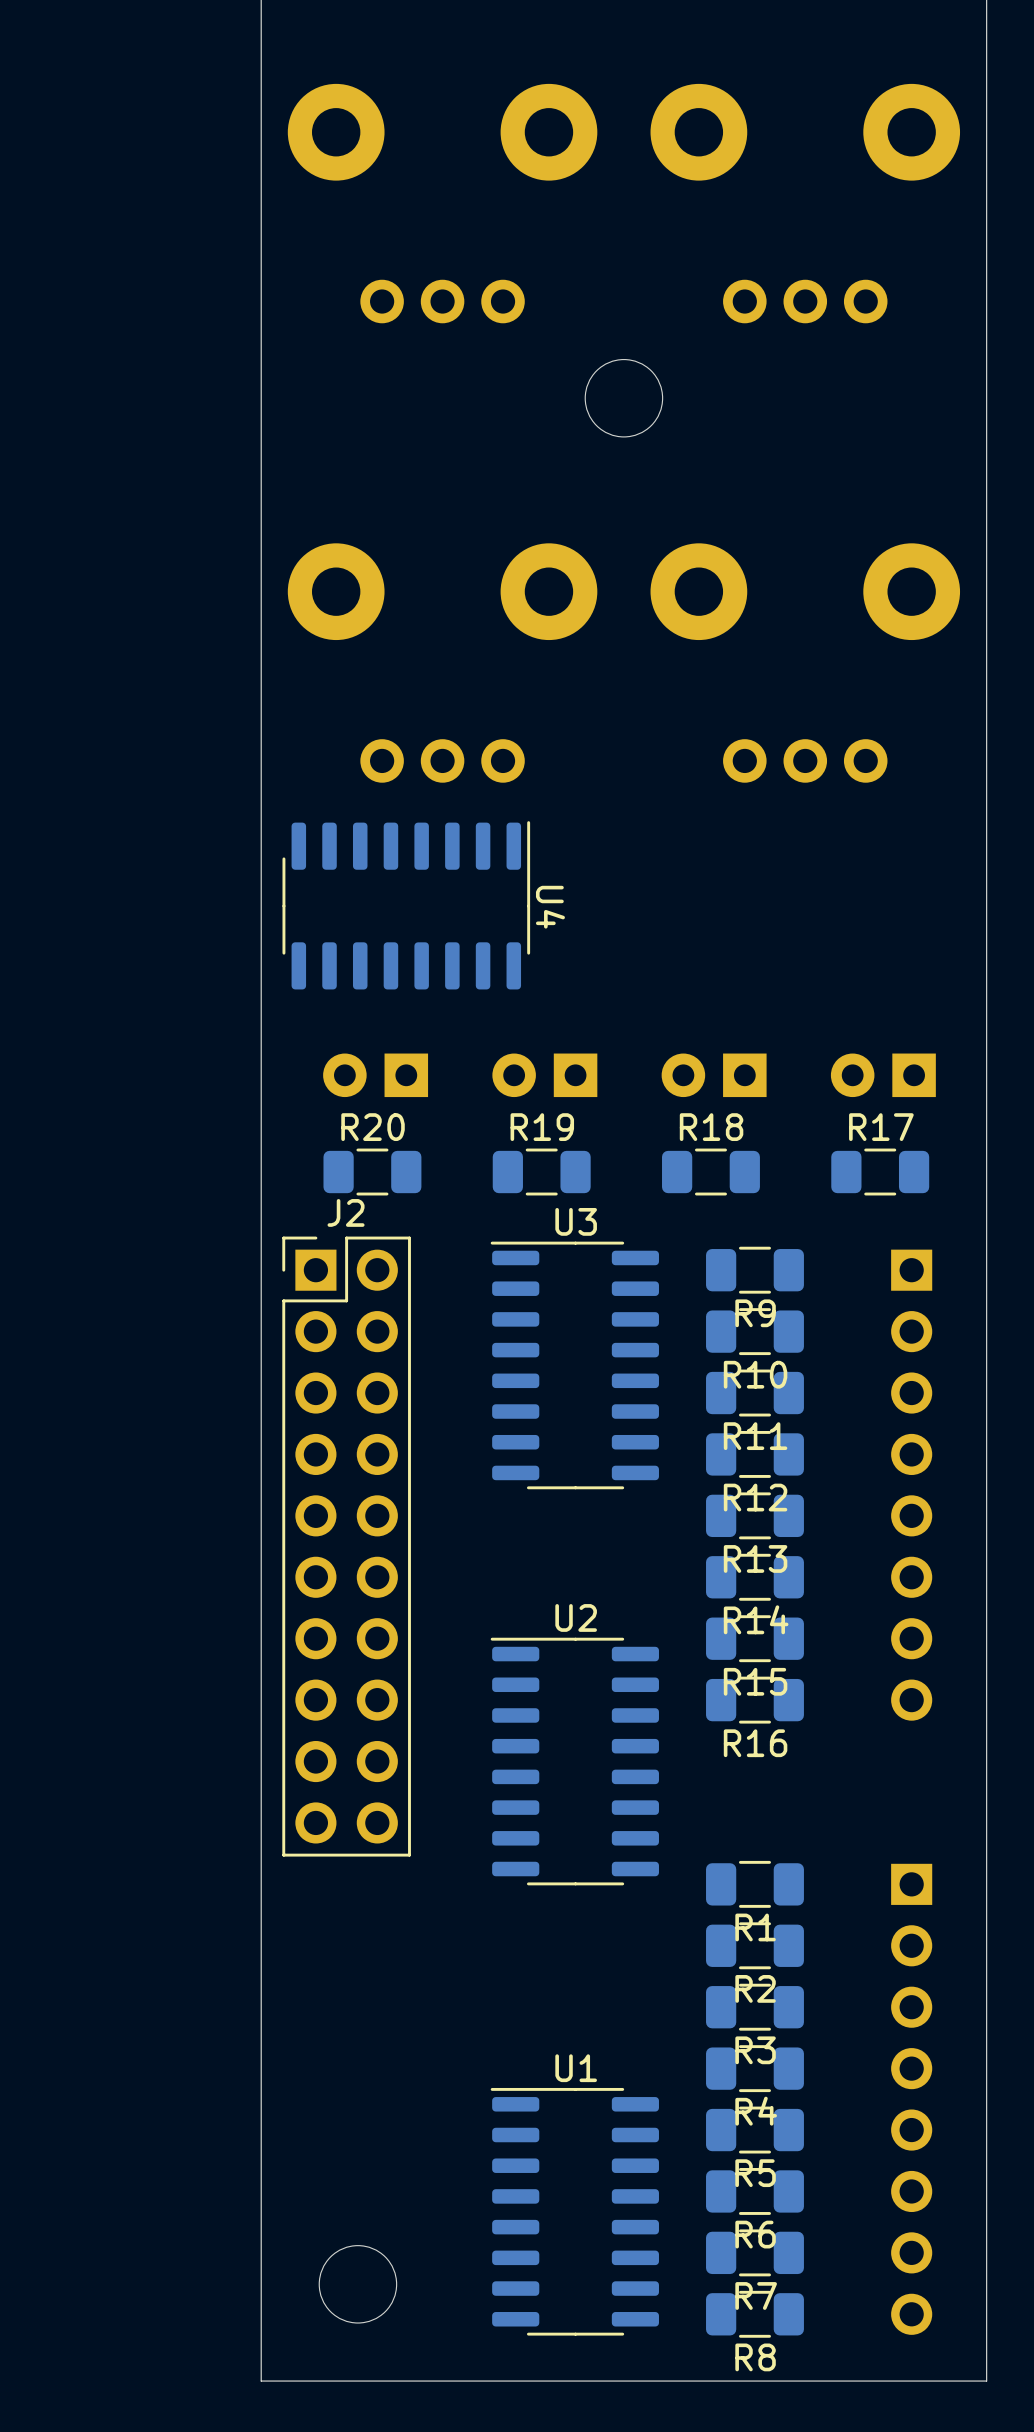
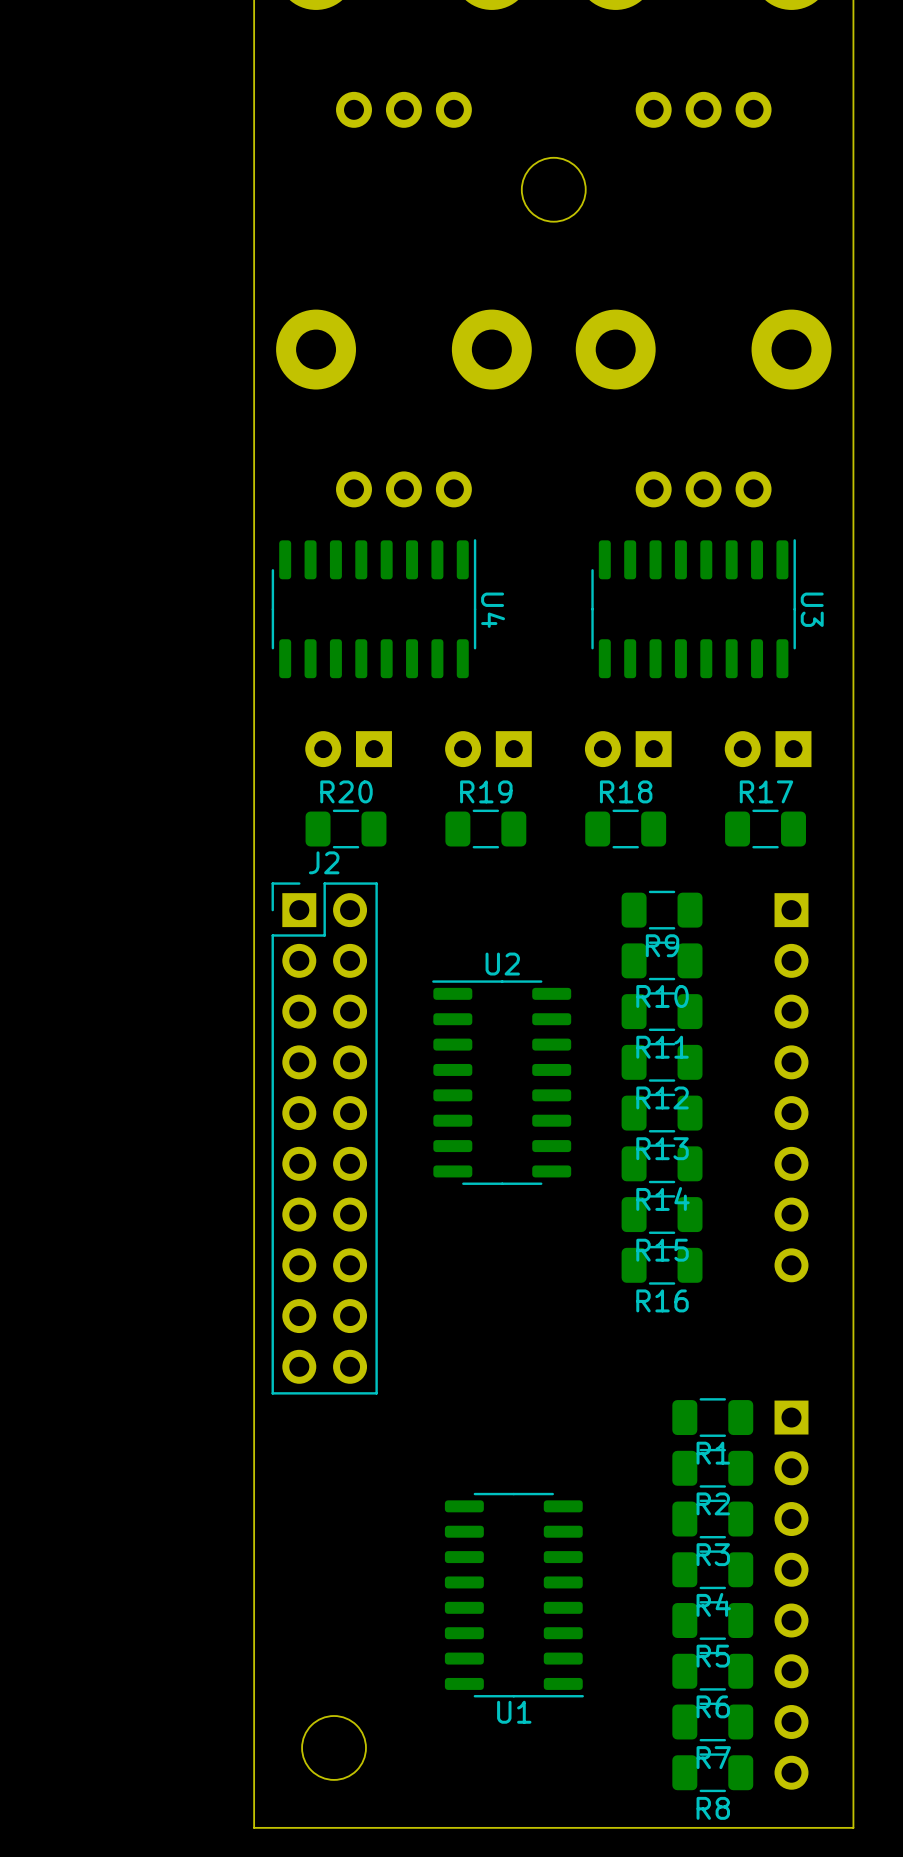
U3 rotation: 0° (574, 1365) -> 90° clockwise (693, 608)
U3 position: (574, 1365) -> (693, 608)
U2 position: (574, 1761) -> (501, 1082)
R1 position: (754, 1884) -> (712, 1417)
R2 position: (754, 1945) -> (712, 1468)
R3 position: (754, 2007) -> (712, 1519)
R4 position: (754, 2068) -> (712, 1569)
R5 position: (754, 2130) -> (712, 1620)
R6 position: (754, 2191) -> (712, 1671)
U1 rotation: 0° (574, 2211) -> 180° (514, 1595)
R7 position: (754, 2252) -> (712, 1721)
R8 position: (754, 2314) -> (712, 1772)

